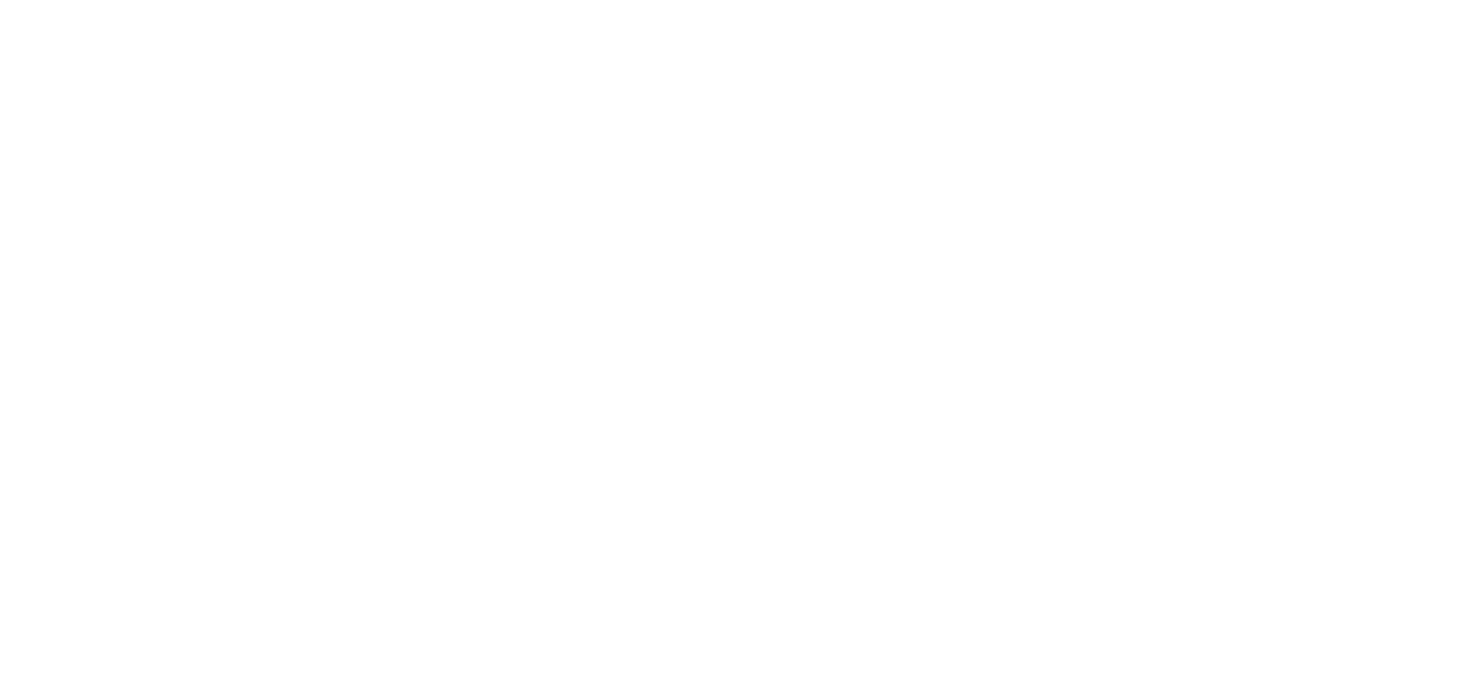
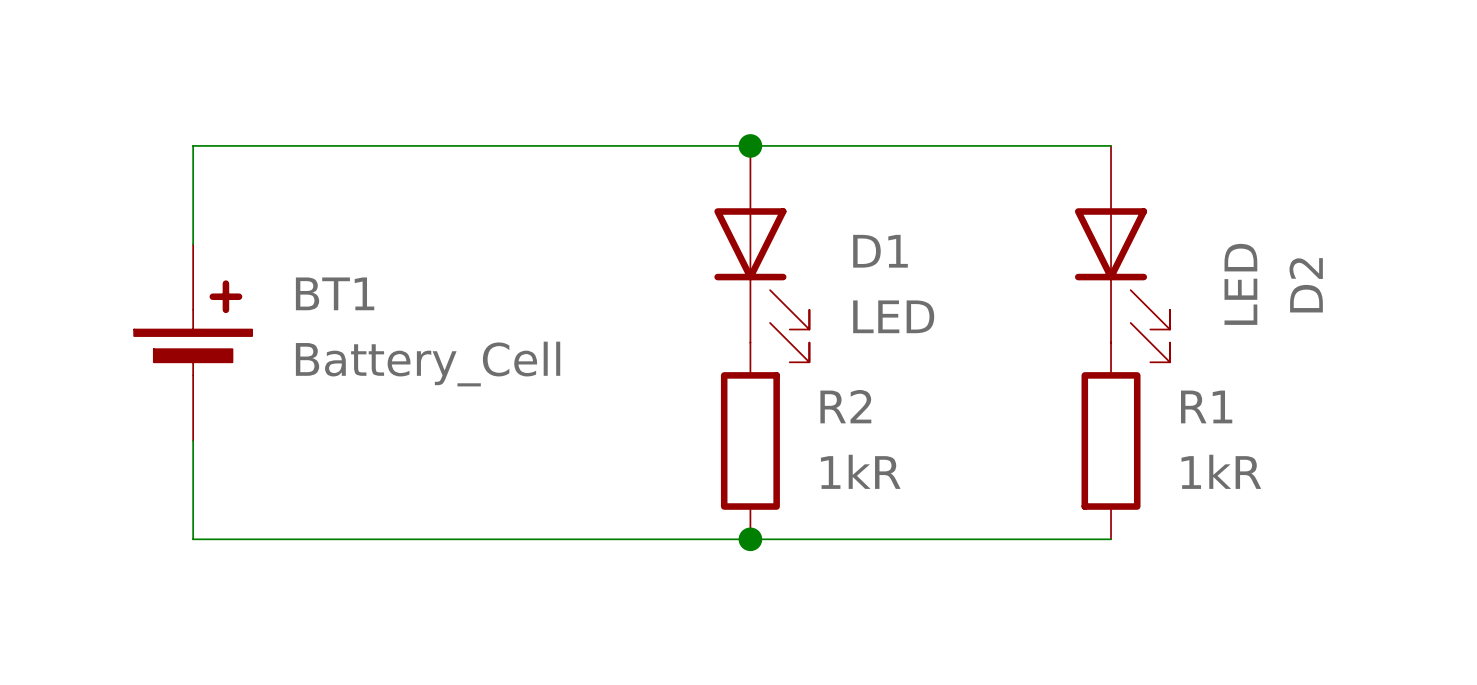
junction: none -> (750, 145)
wire: none -> (1111, 145) (193, 145) (193, 244)
D1: none -> LED (761, 254)
D2: none -> LED (1122, 254)
BT1: none -> Battery_Cell (193, 342)
wire: none -> (193, 440) (193, 539) (1111, 539)
R2: none -> 1kR (750, 440)
R1: none -> 1kR (1111, 440)
junction: none -> (750, 539)

